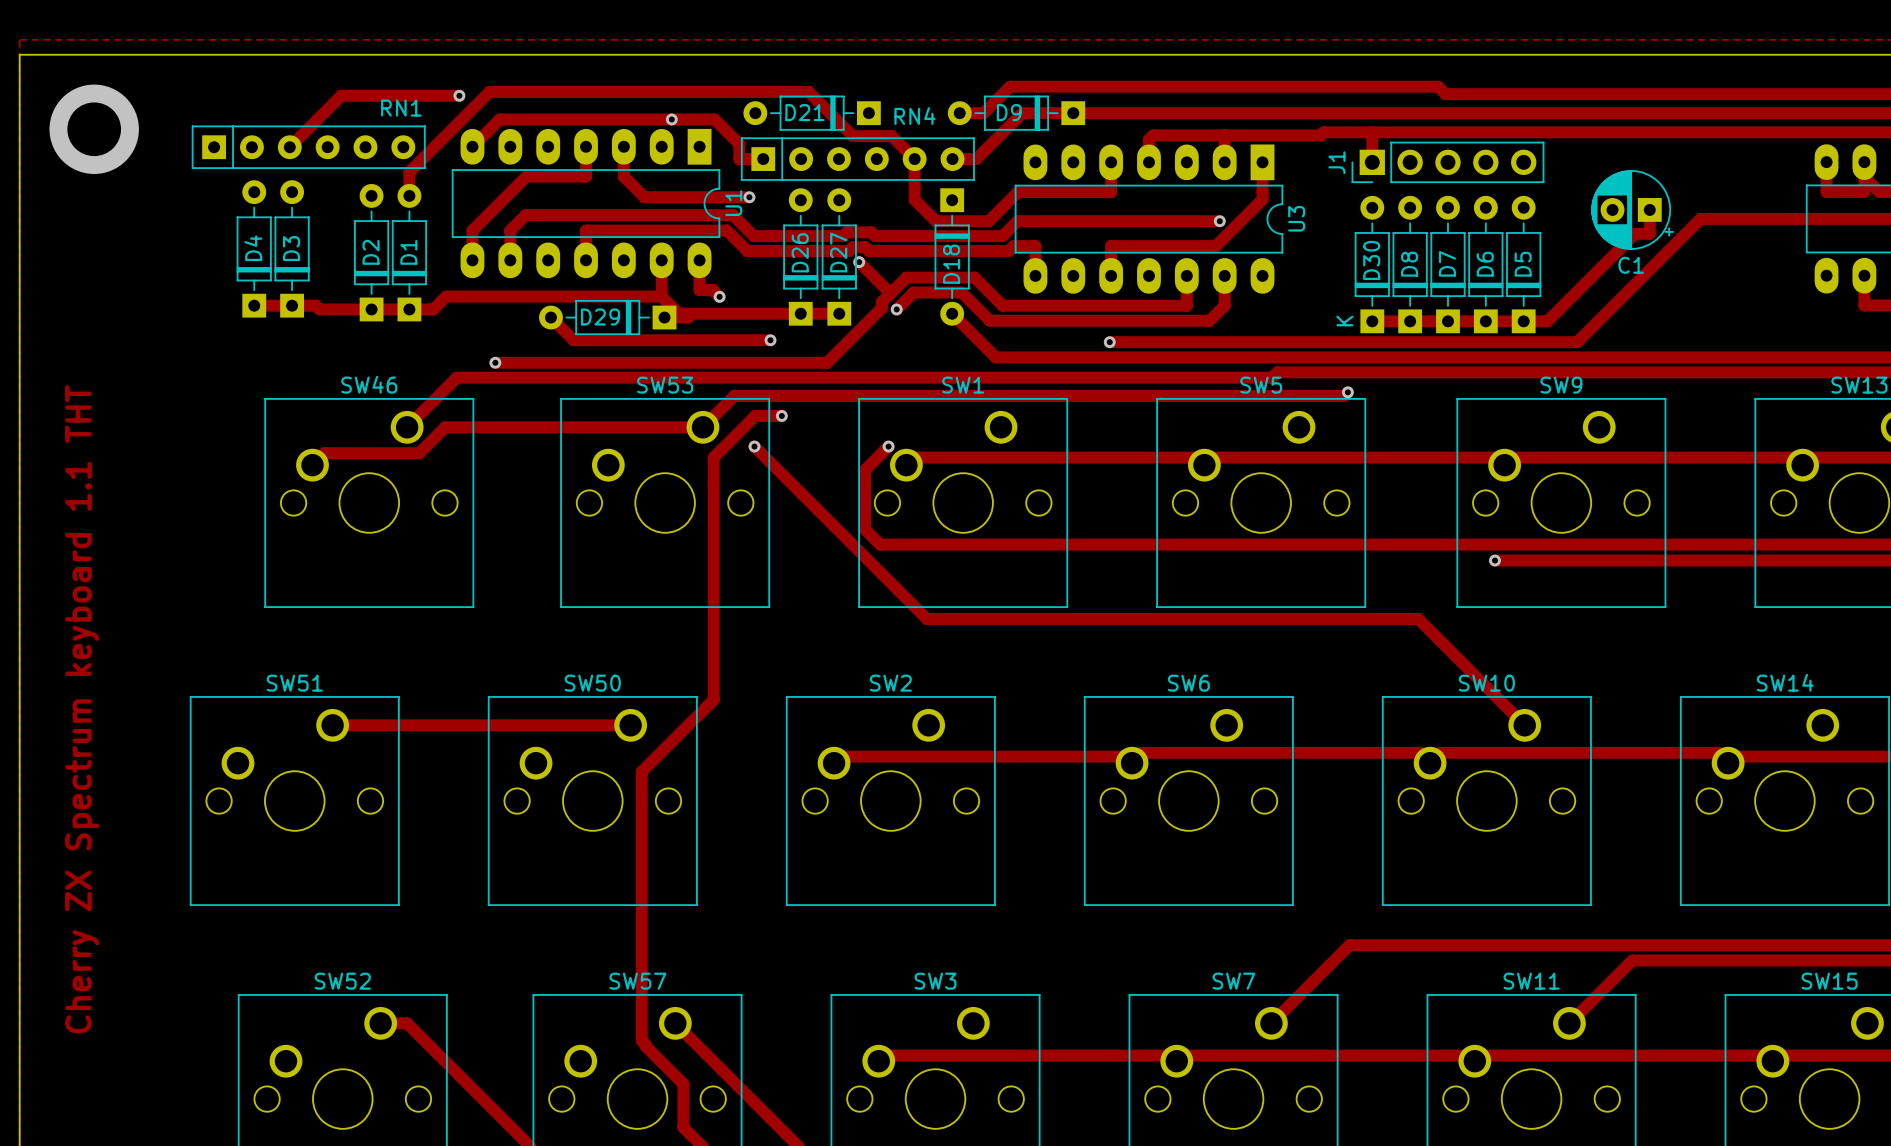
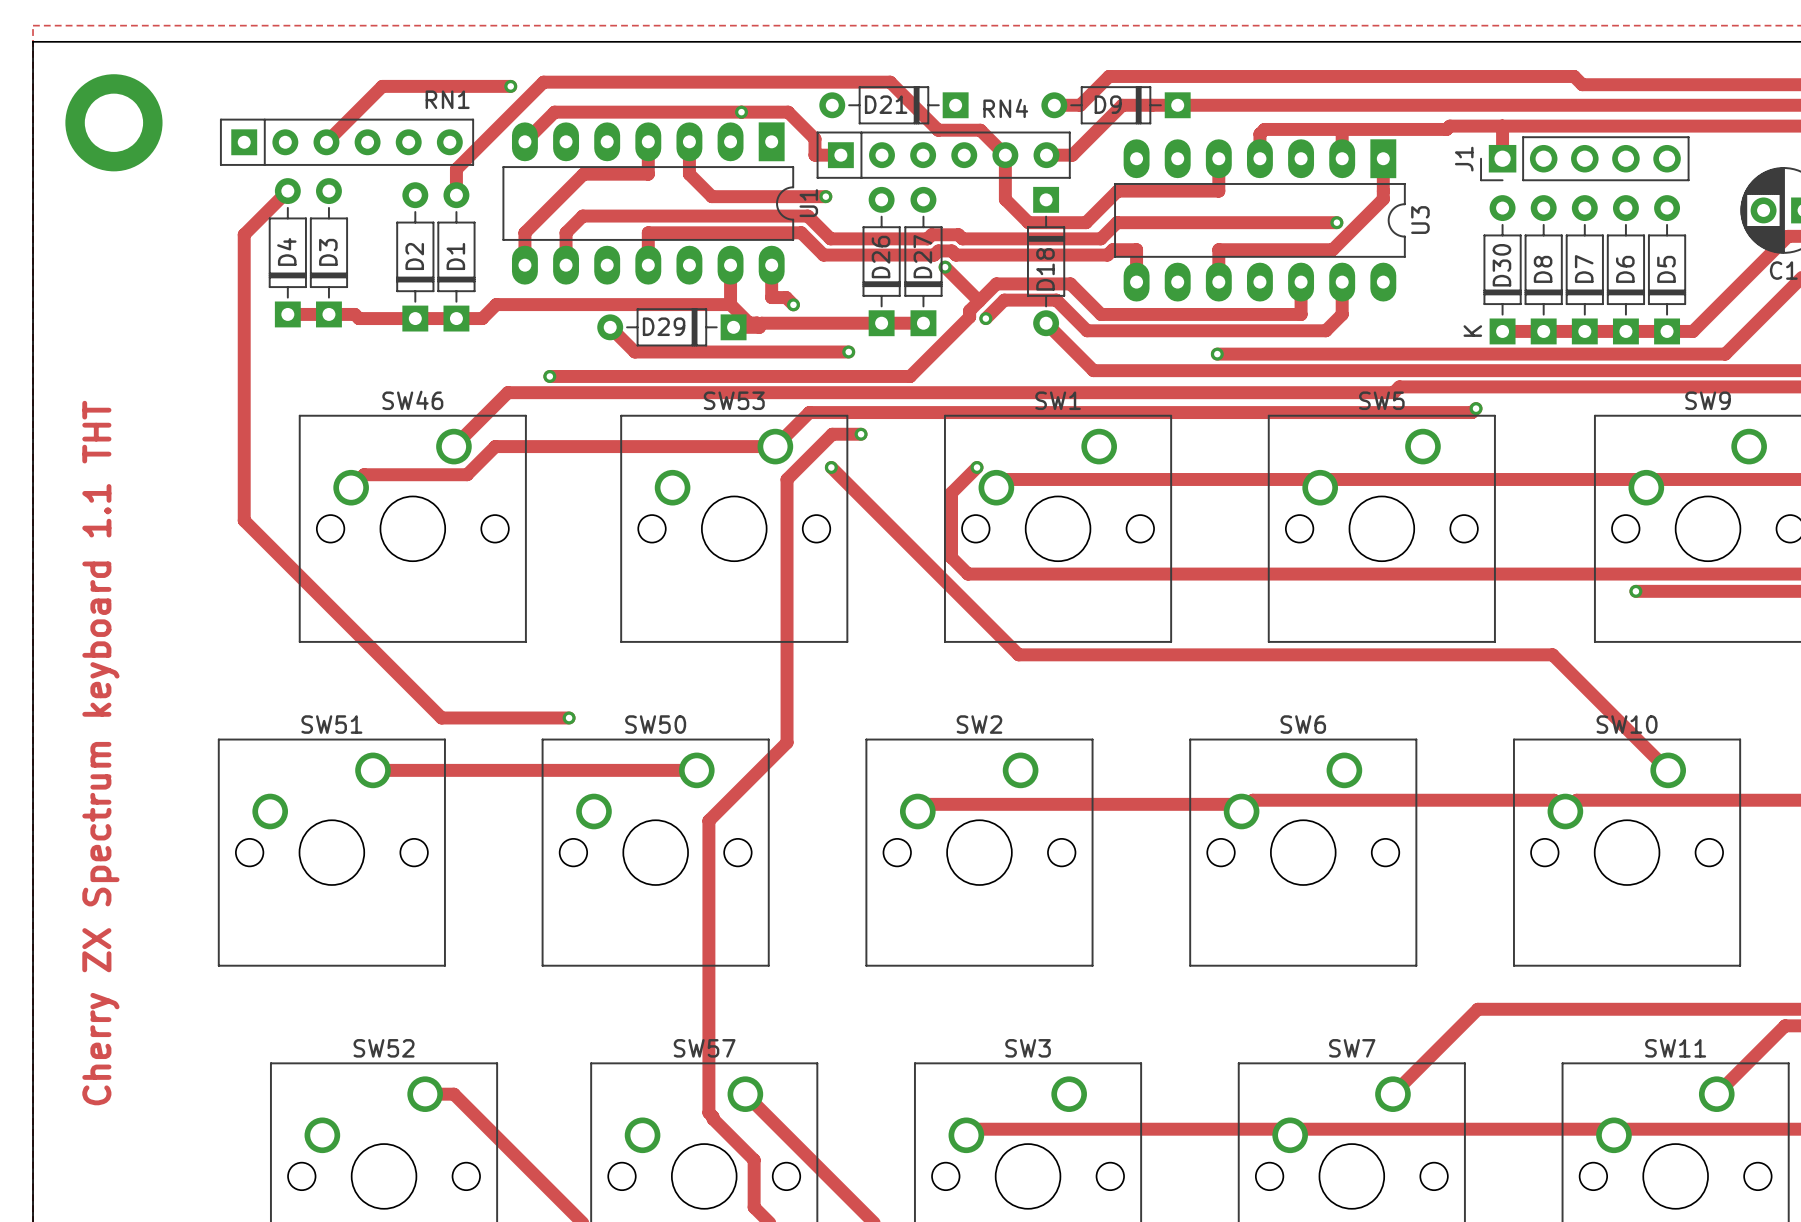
track: none -> (287, 191) (244, 234) (244, 520) (441, 717) (569, 717)
via: none -> (569, 717)

